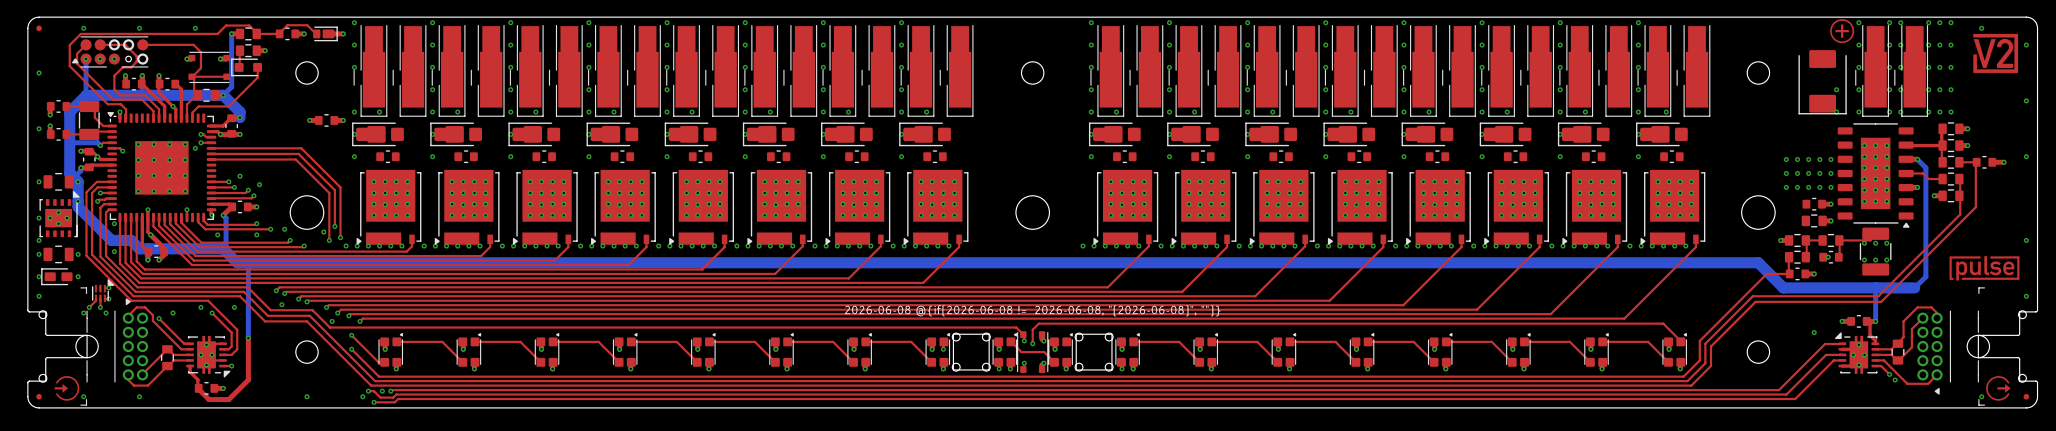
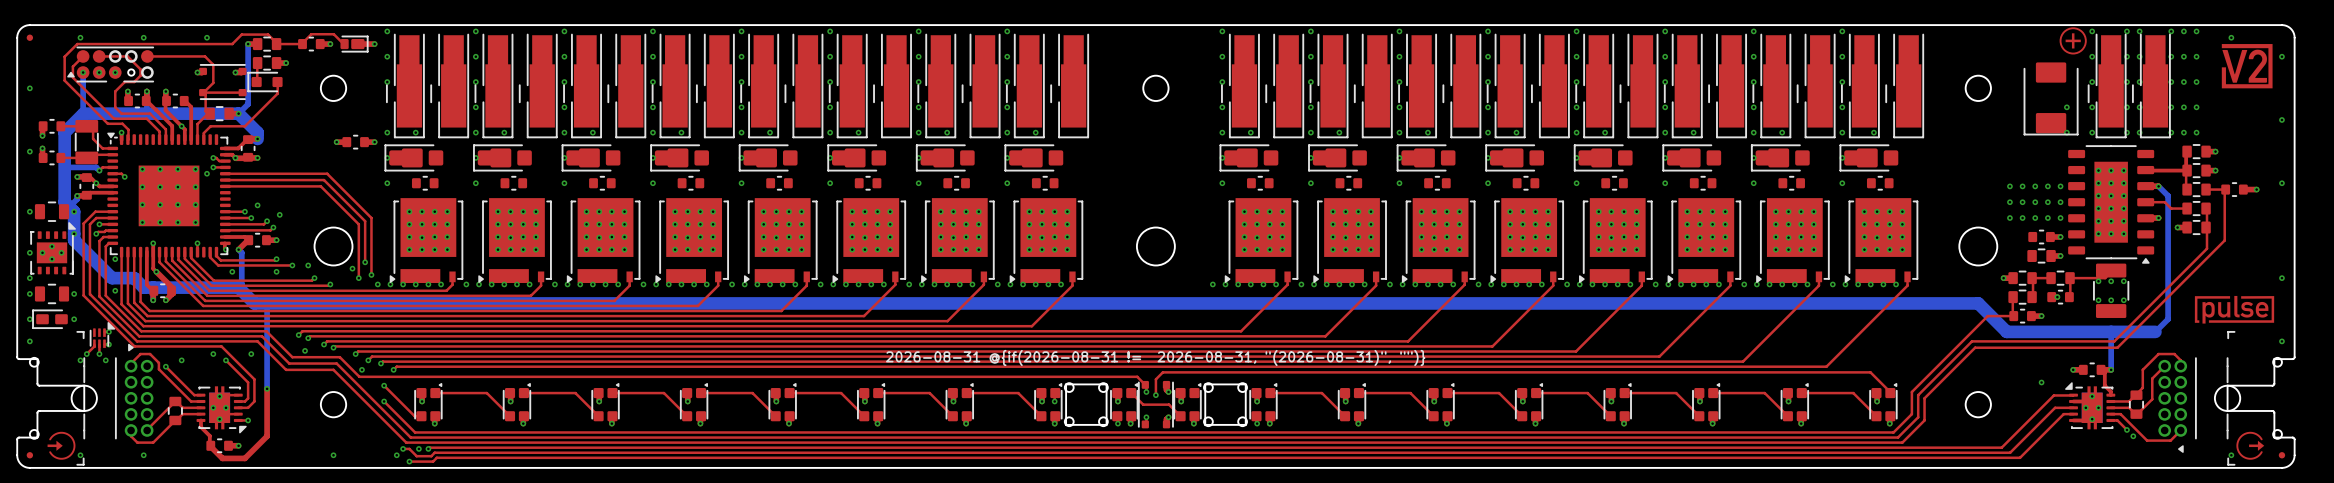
drawing shape: [845, 305, 1221, 317] -> [886, 350, 1426, 366]

